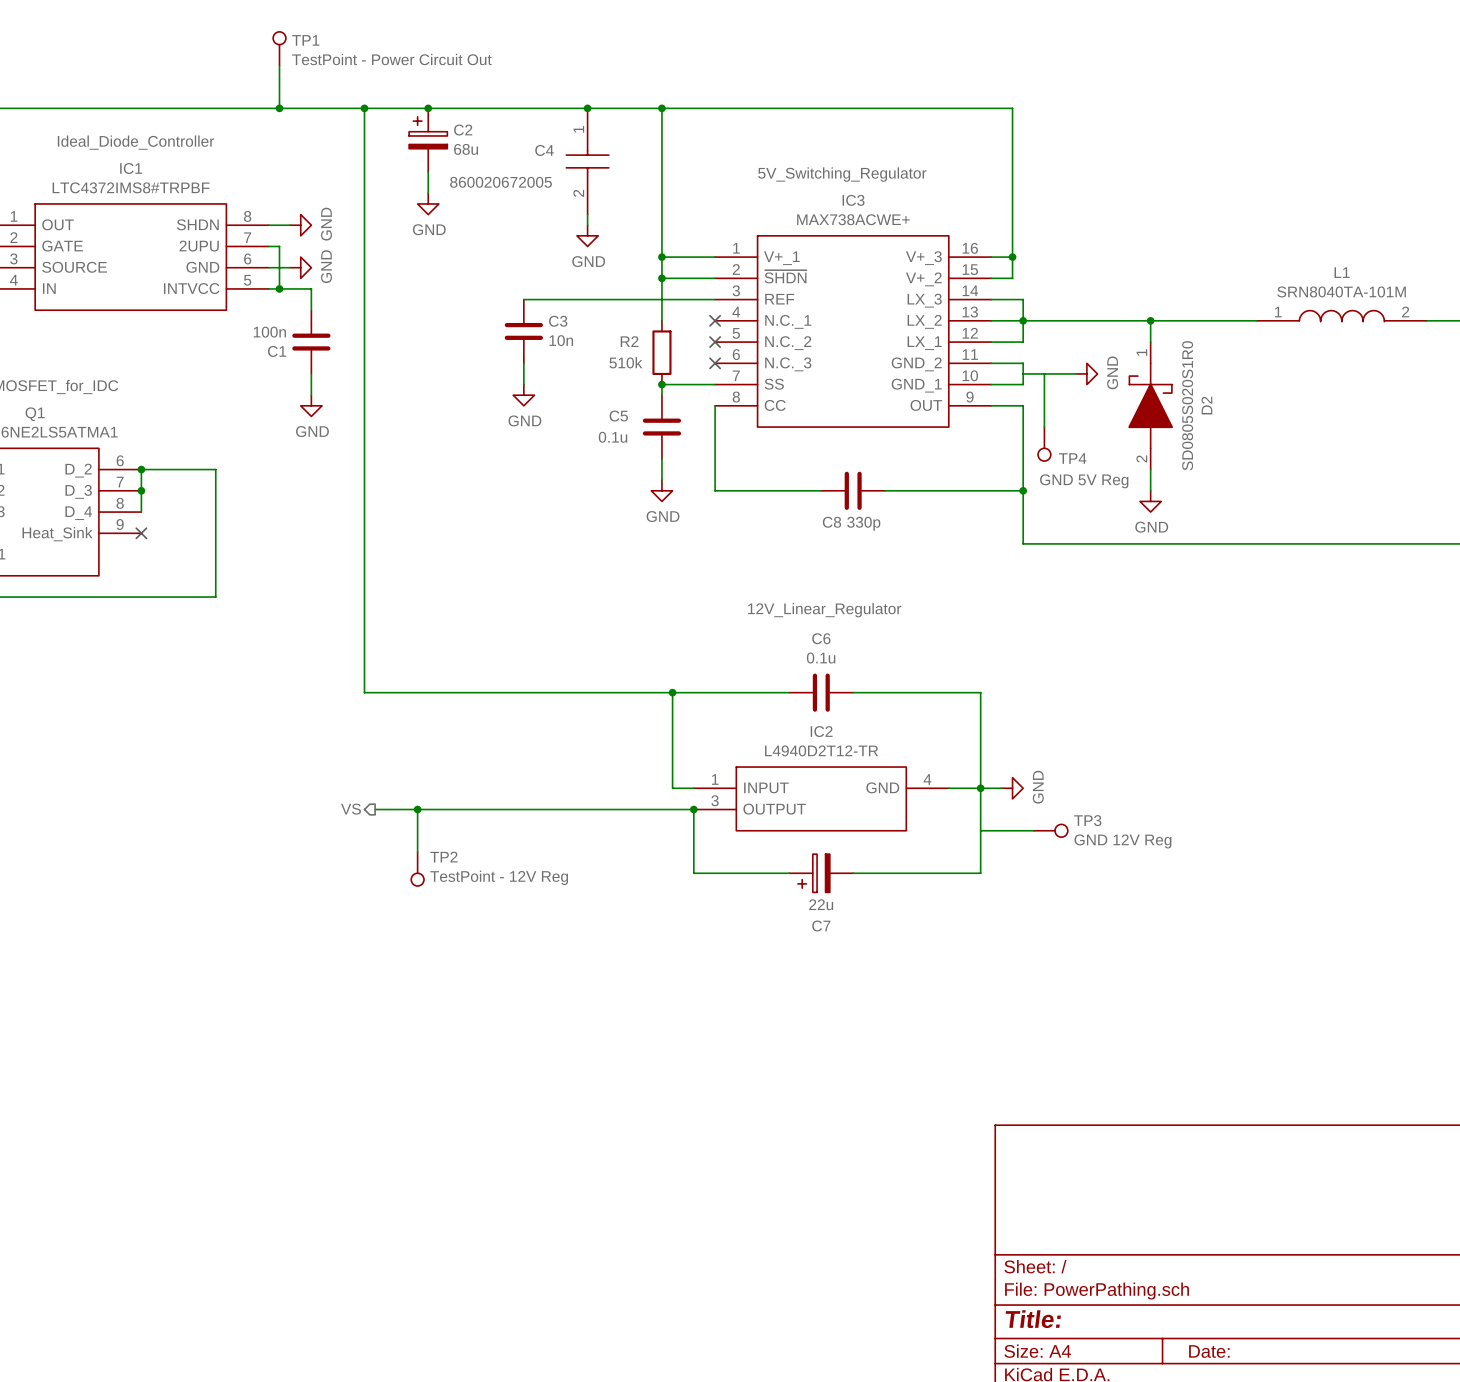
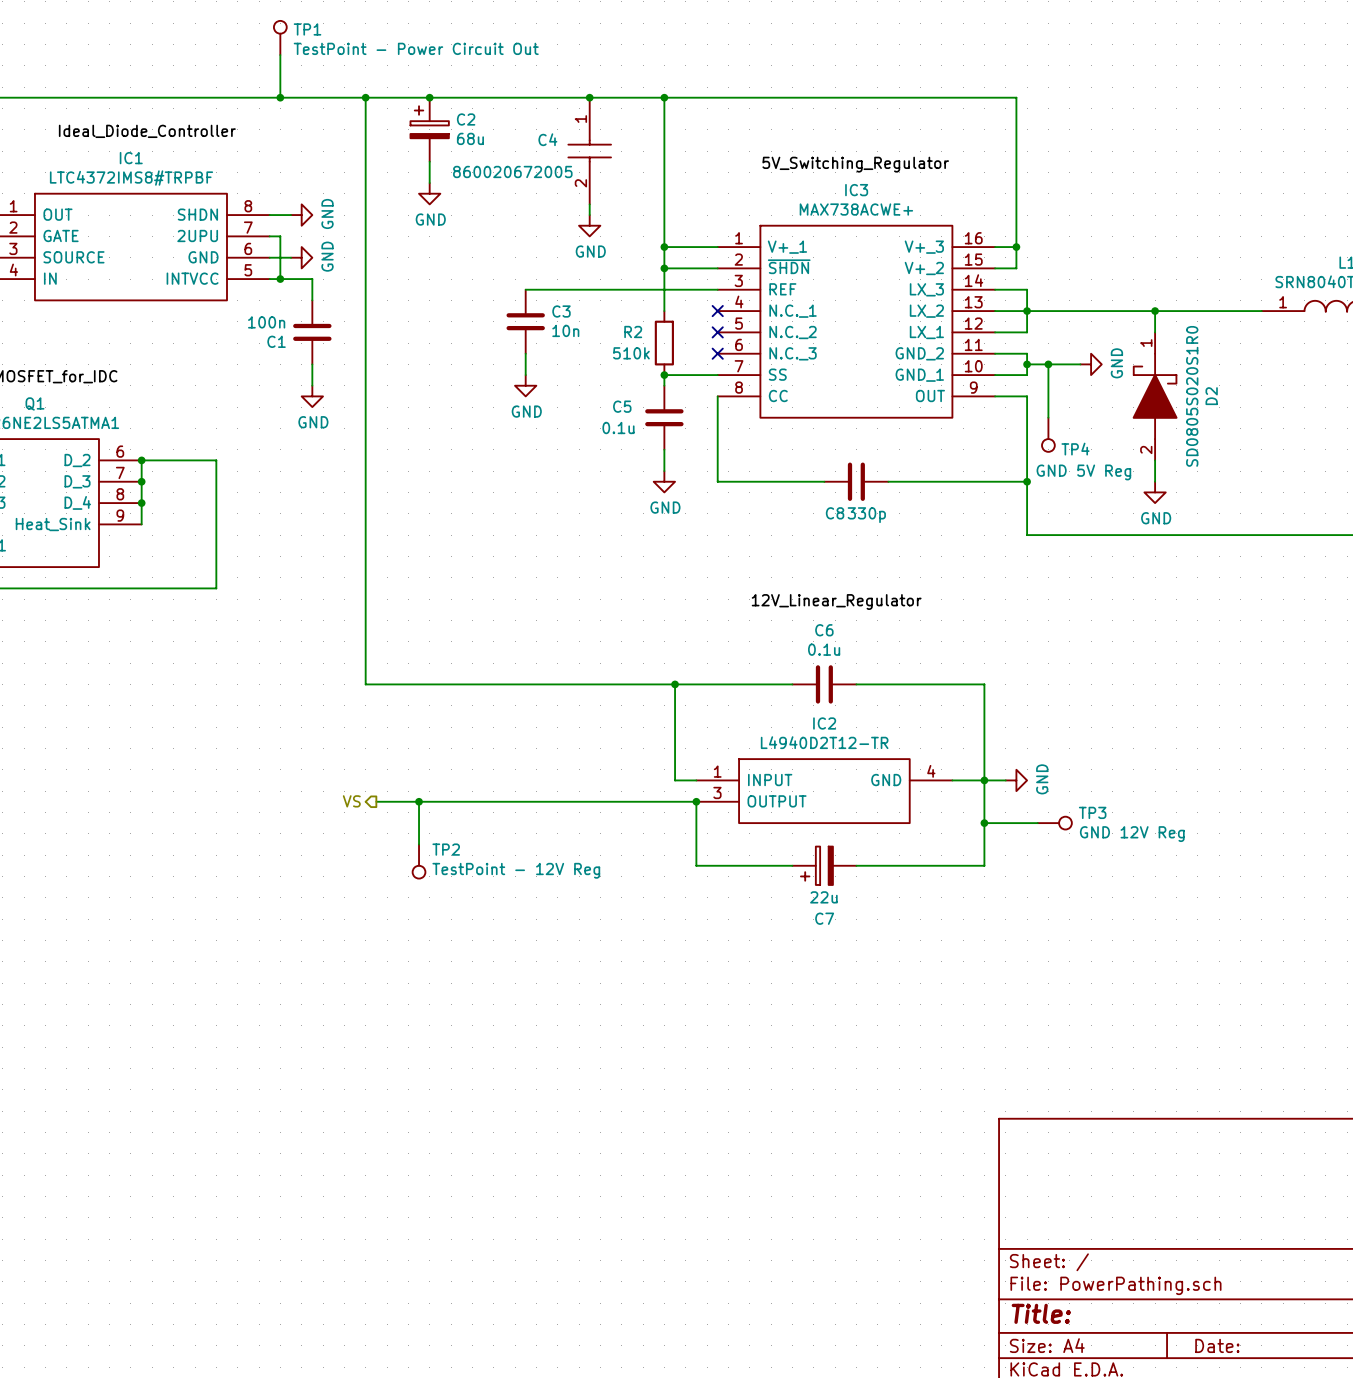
junction: none -> (1027, 364)
junction: none -> (1048, 364)
wire: none -> (141, 503) (141, 524)
junction: none -> (141, 503)
no-connect mark: (141, 533) -> none
junction: none -> (984, 823)

